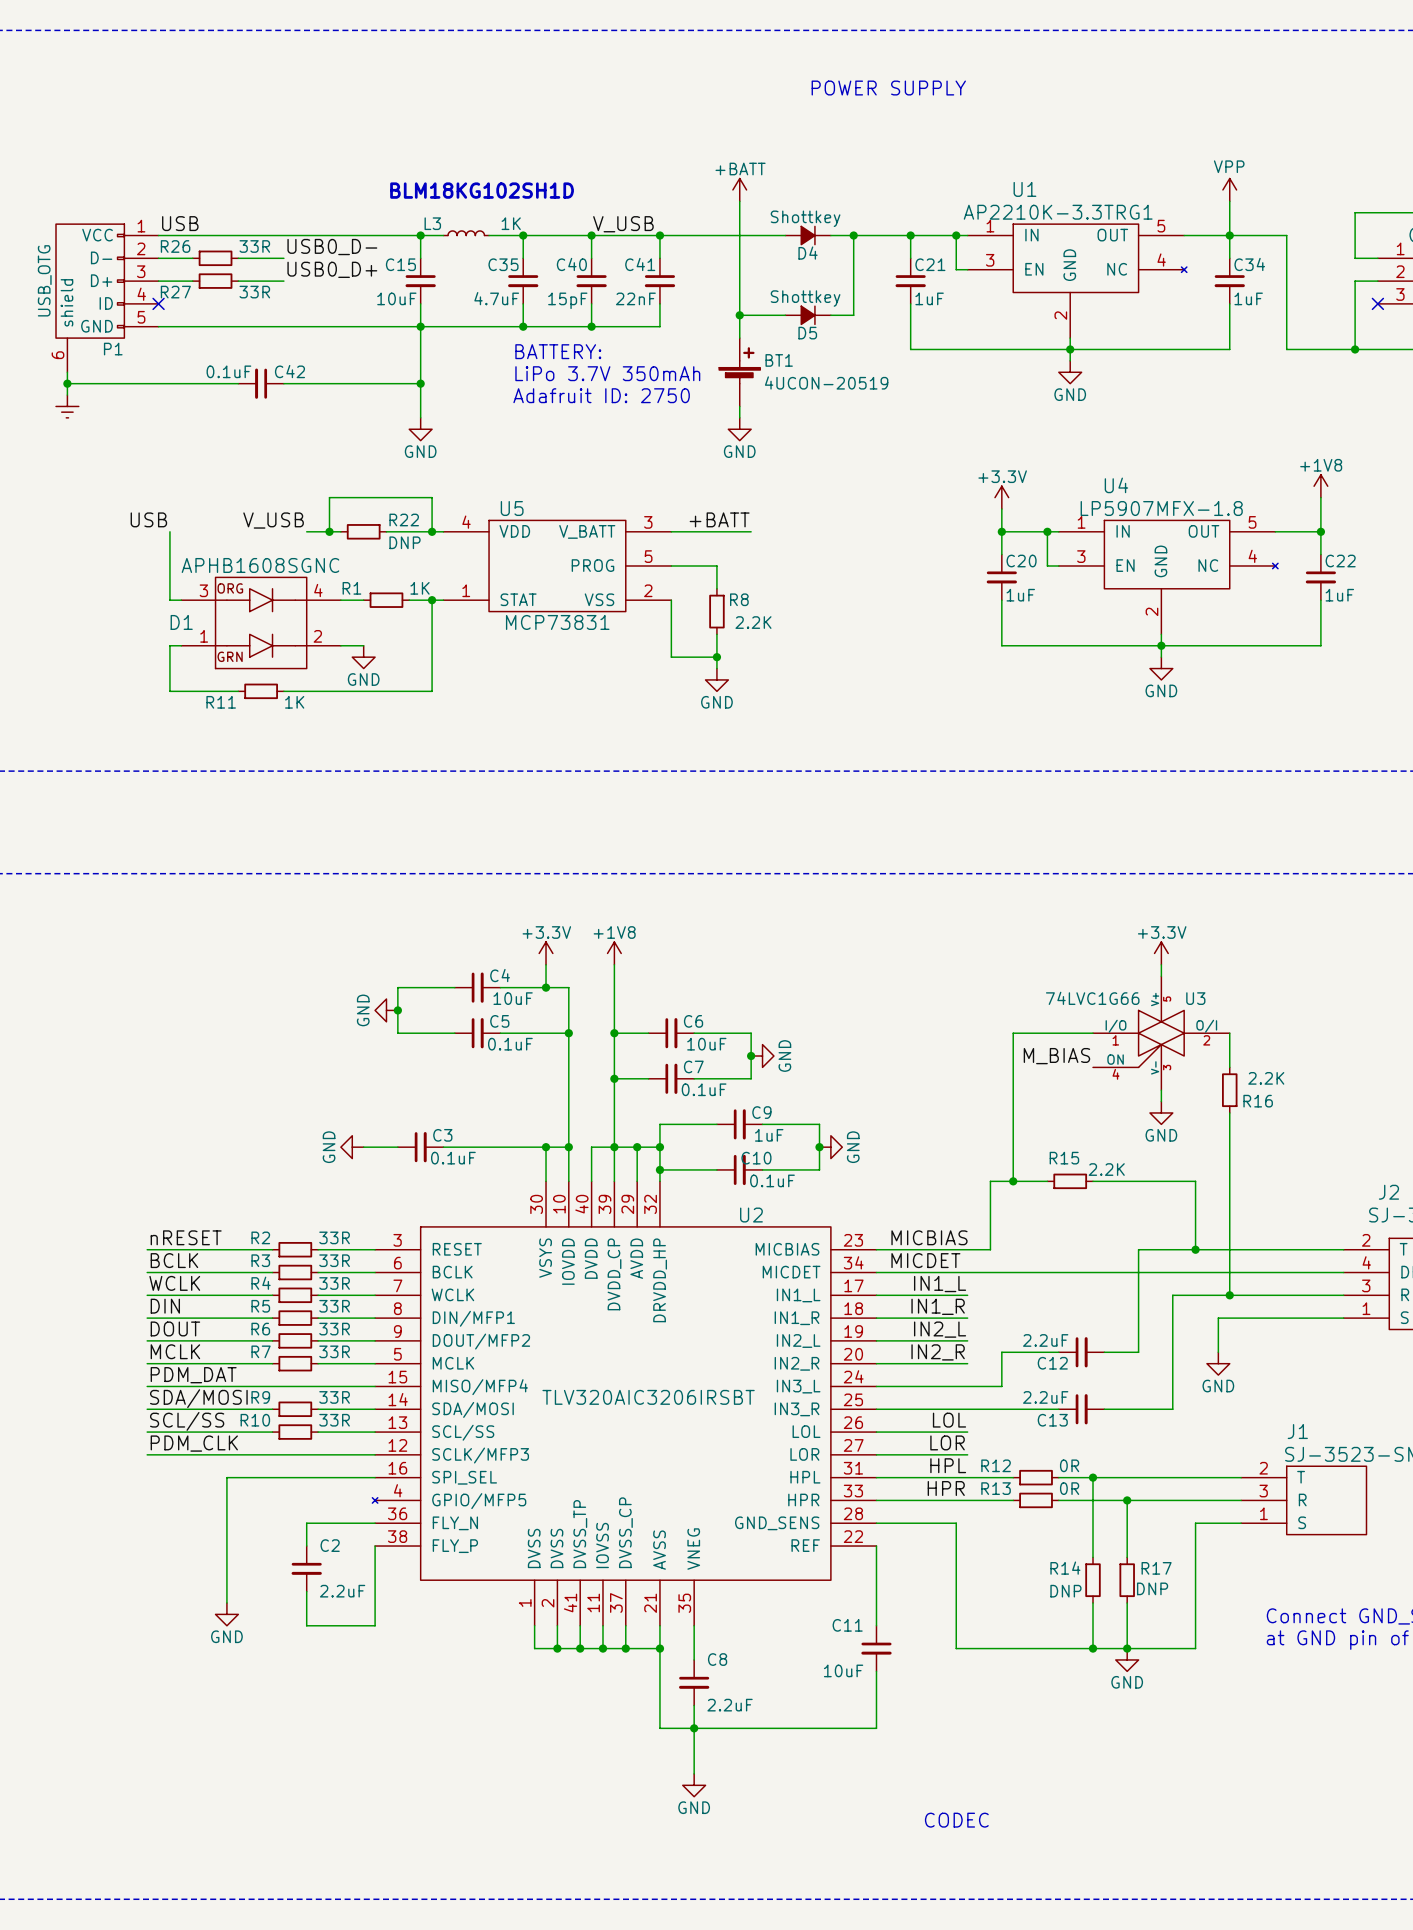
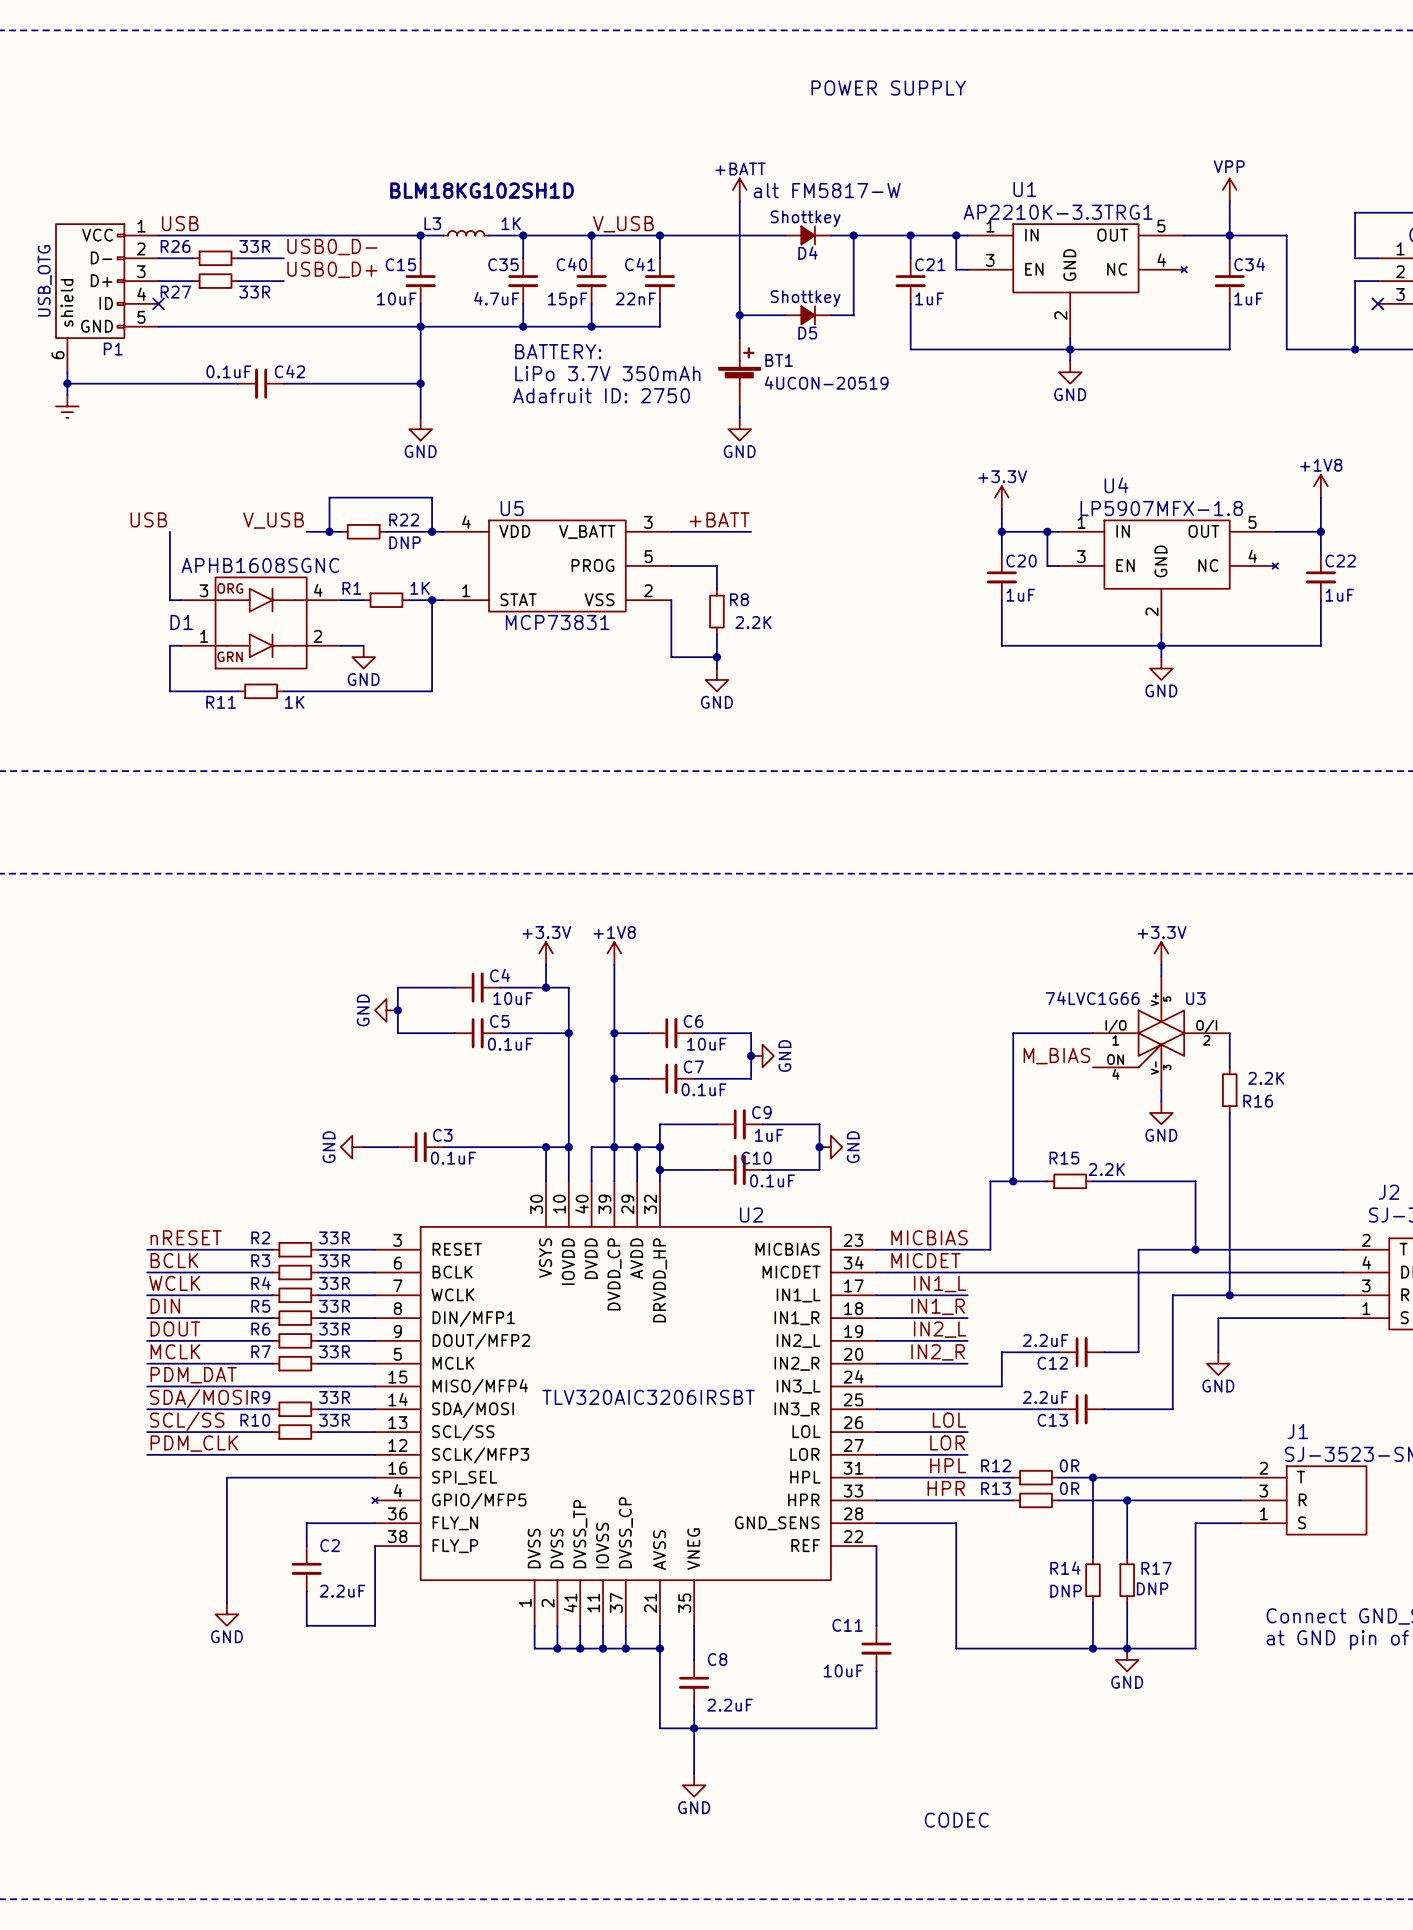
text: none -> alt FM5817-W (827, 190)

